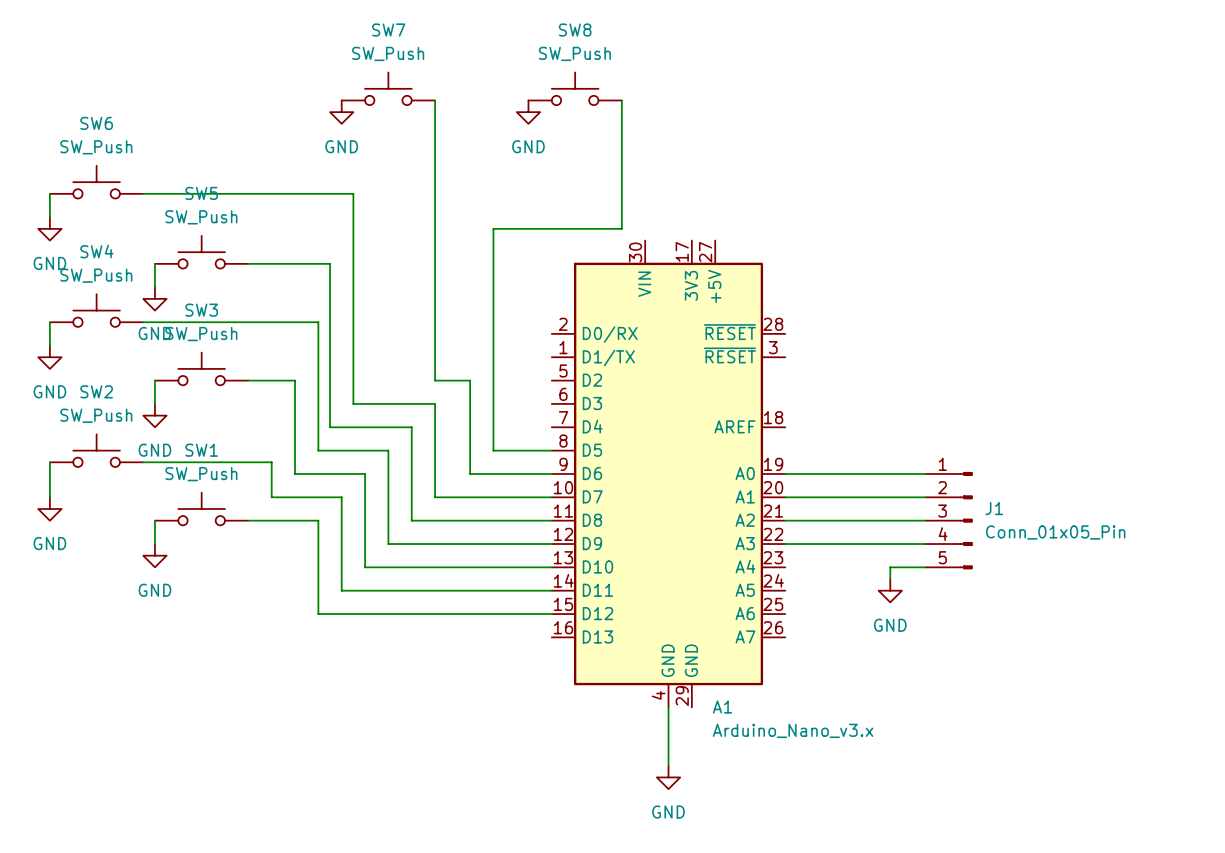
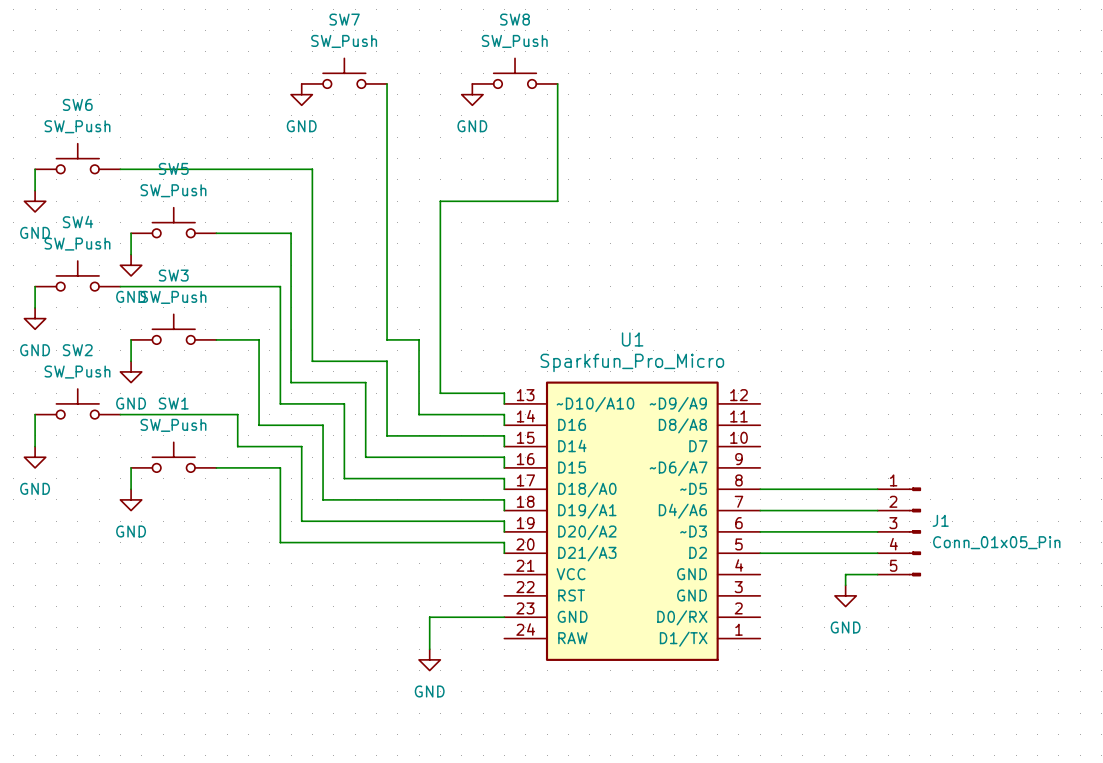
wire: (493, 438) (493, 450) (551, 450) -> (440, 393) (504, 393) (504, 403)
wire: (470, 462) (470, 473) (551, 473) -> (419, 414) (504, 414) (504, 425)
A1: Arduino_Nano_v3.x (668, 473) -> none
wire: (785, 473) (925, 473) -> none
wire: (435, 485) (435, 497) (551, 497) -> (387, 435) (504, 435) (504, 446)
wire: (785, 497) (925, 497) -> none
wire: (411, 508) (411, 520) (551, 520) -> (365, 457) (504, 457) (504, 467)
wire: (785, 520) (925, 520) -> none
J1 position: (949, 520) -> (899, 531)
wire: (388, 532) (388, 544) (551, 544) -> (344, 478) (504, 478) (504, 489)
wire: (365, 555) (365, 567) (551, 567) -> (323, 499) (504, 499) (504, 510)
wire: (890, 567) (890, 579) -> (802, 510) (760, 510)
wire: (341, 579) (341, 590) (551, 590) -> (301, 521) (504, 521) (504, 531)
U1: none -> Sparkfun_Pro_Micro (632, 521)
wire: none -> (760, 531) (877, 531)
power symbol position: GND (890, 590) -> GND (845, 595)
wire: (318, 602) (318, 614) (551, 614) -> (280, 542) (504, 542) (504, 553)
wire: none -> (760, 553) (877, 553)
wire: none -> (877, 574) (845, 574) (845, 585)
wire: none -> (504, 617) (429, 617) (429, 649)
wire: (668, 707) (668, 765) -> none
power symbol: none -> GND (429, 659)
power symbol: GND (668, 777) -> none

